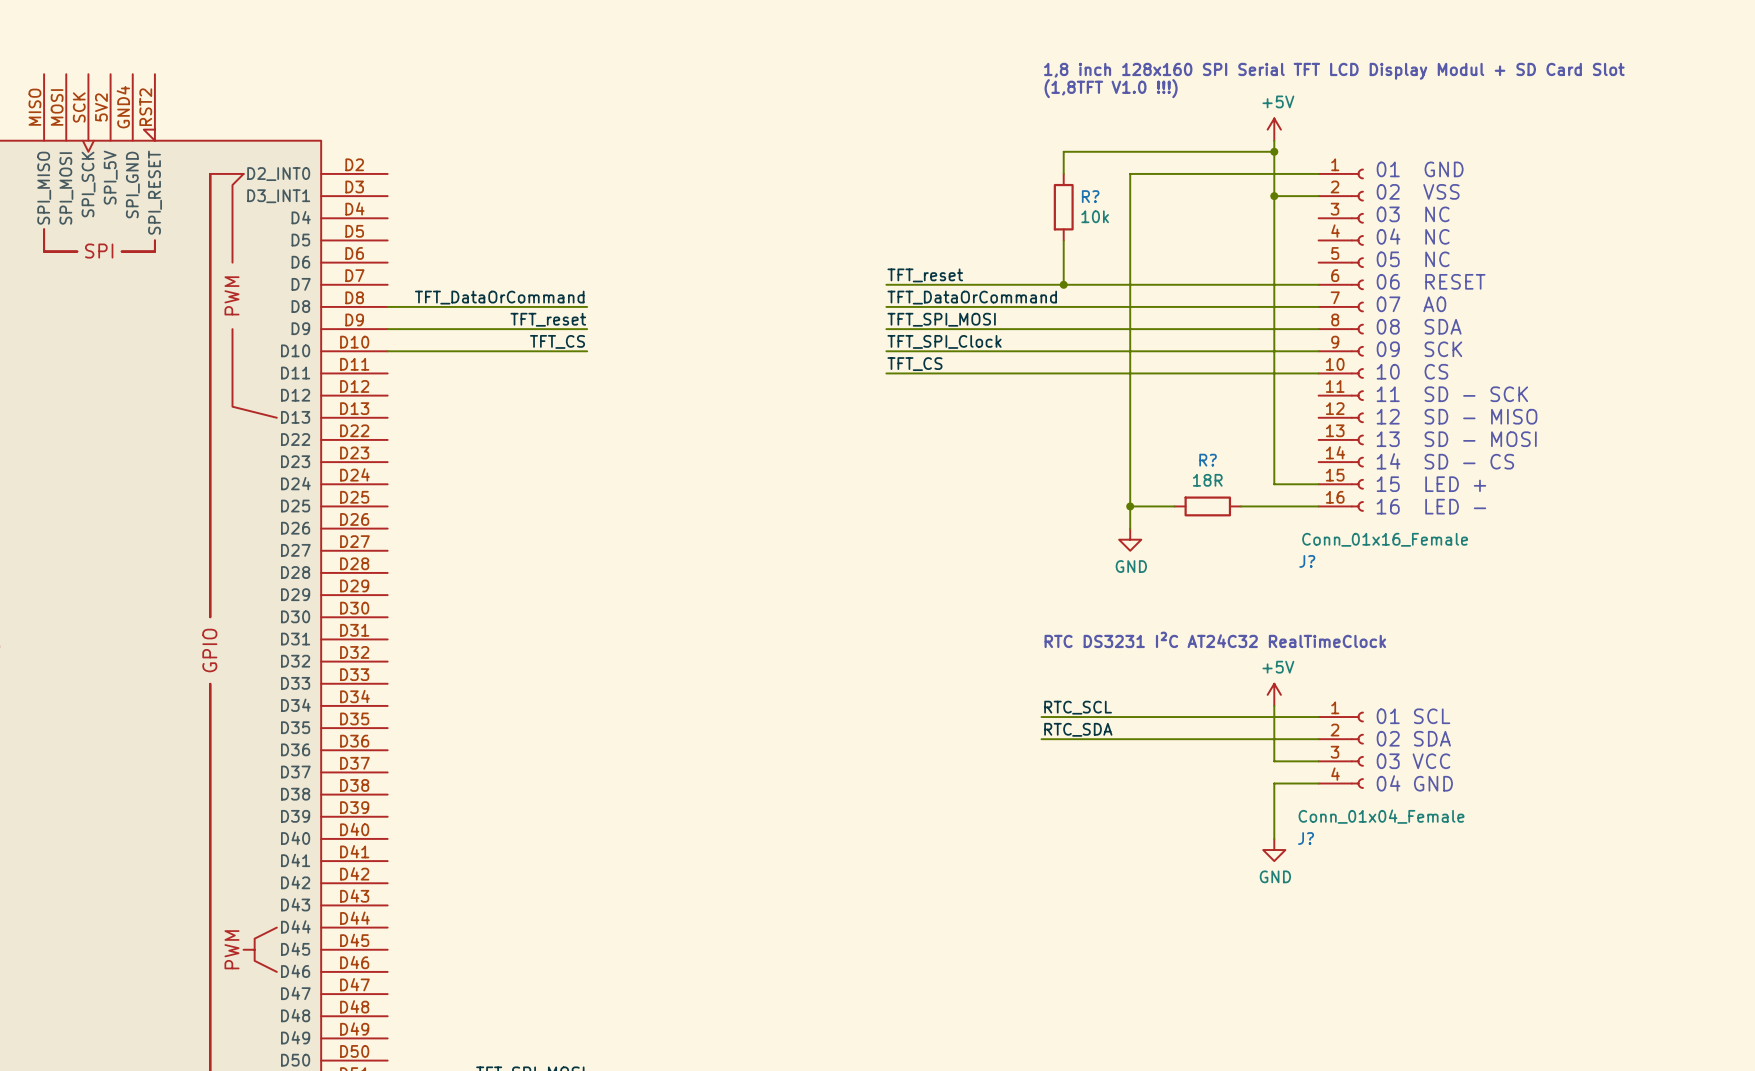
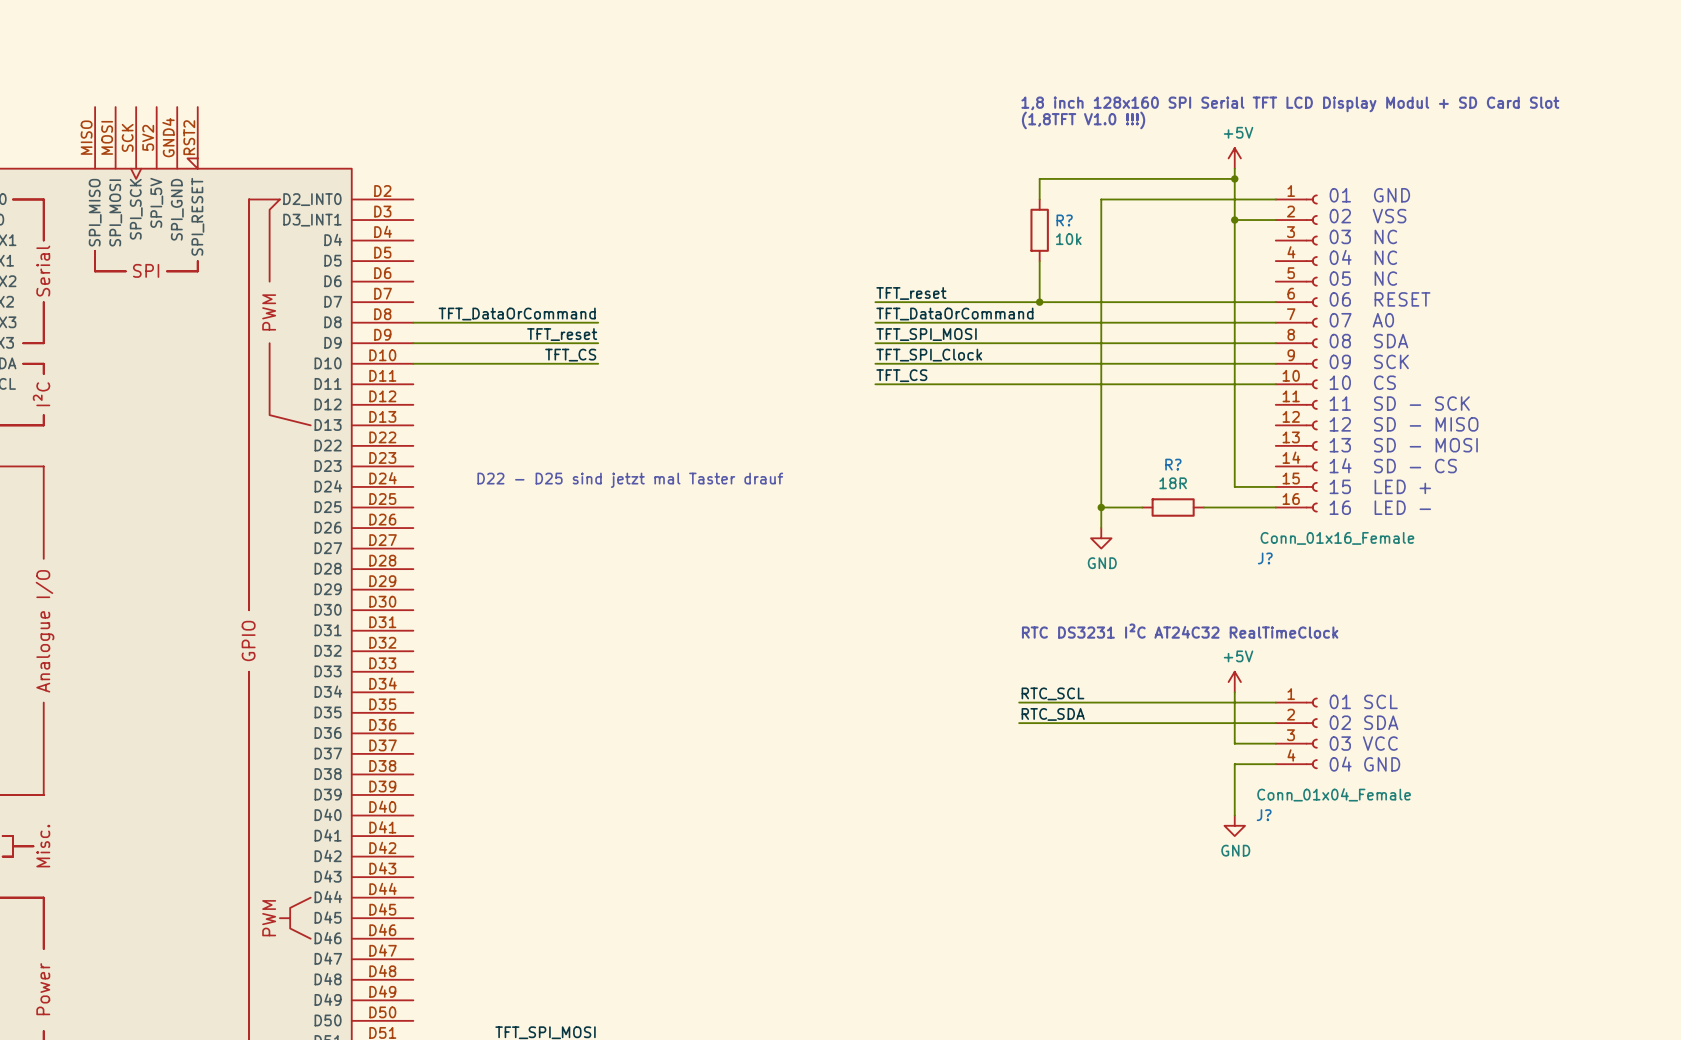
text: none -> D22 - D25 sind jetzt mal Taster drauf (630, 480)

